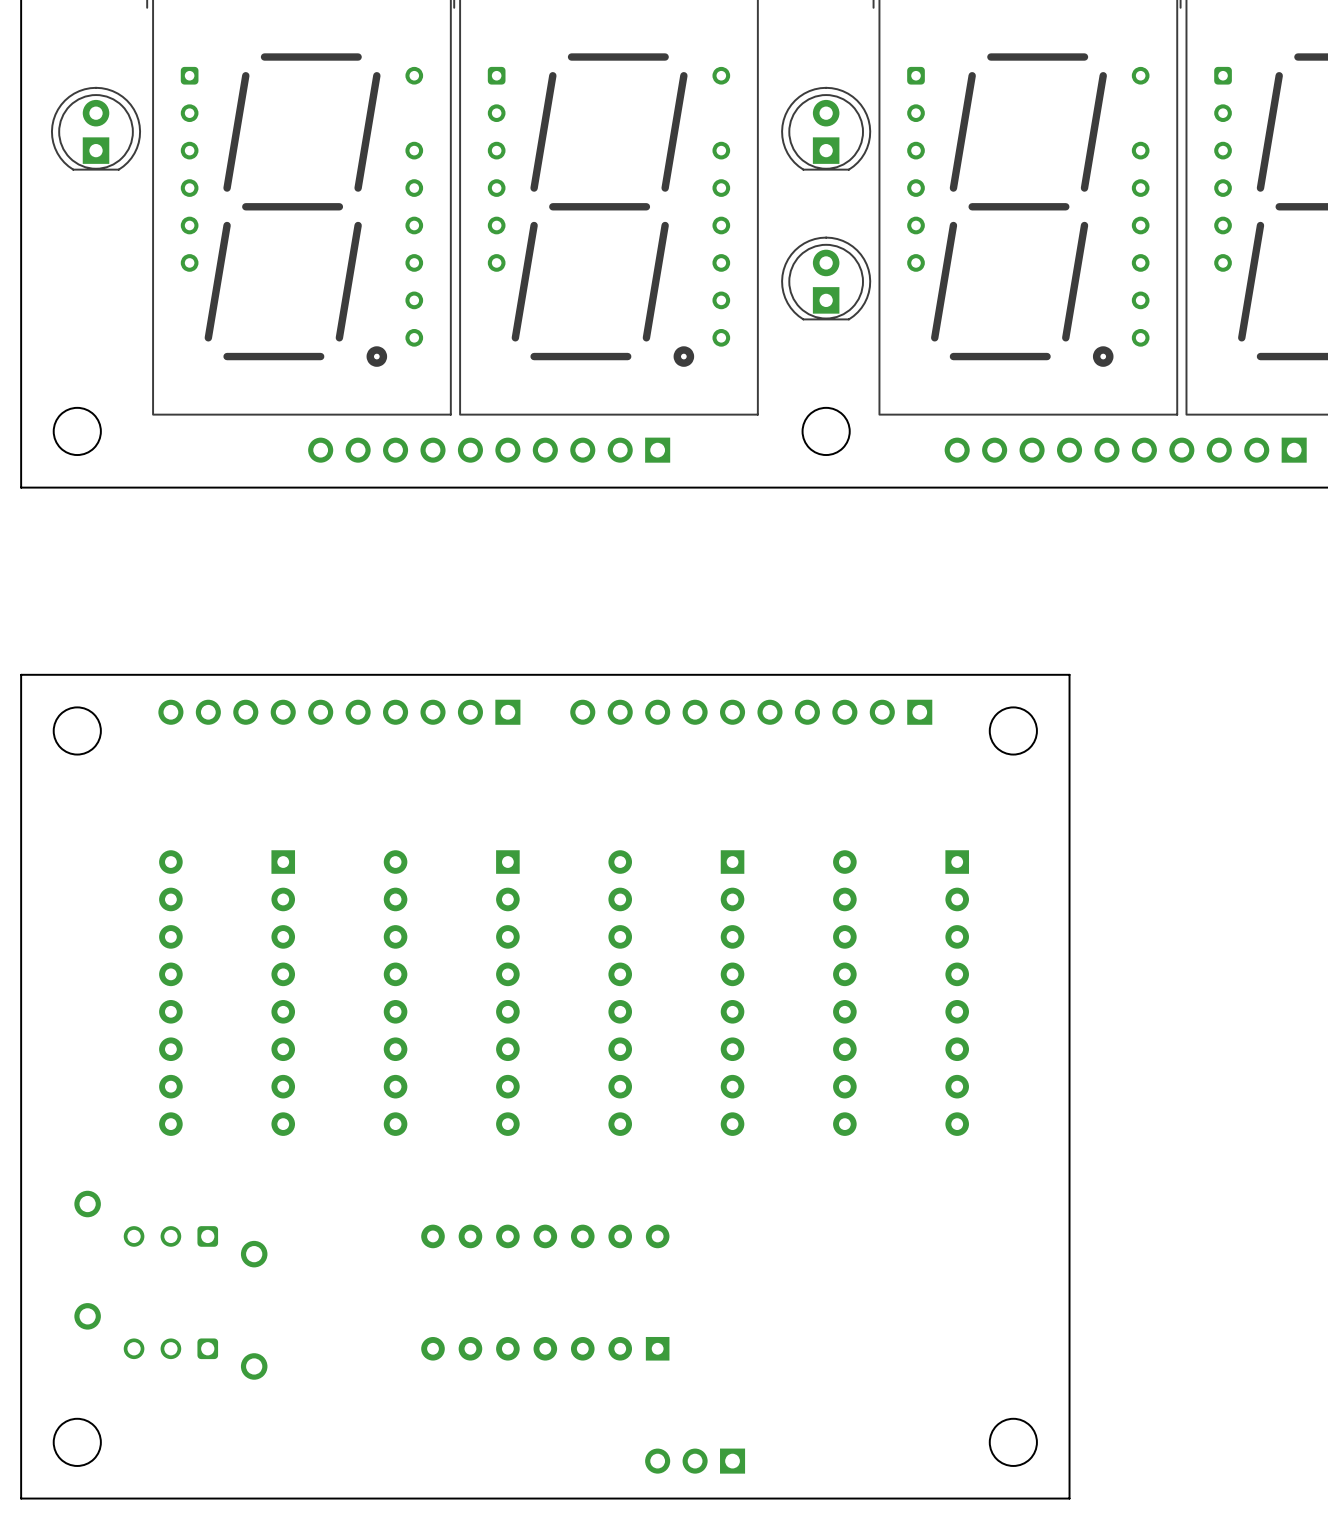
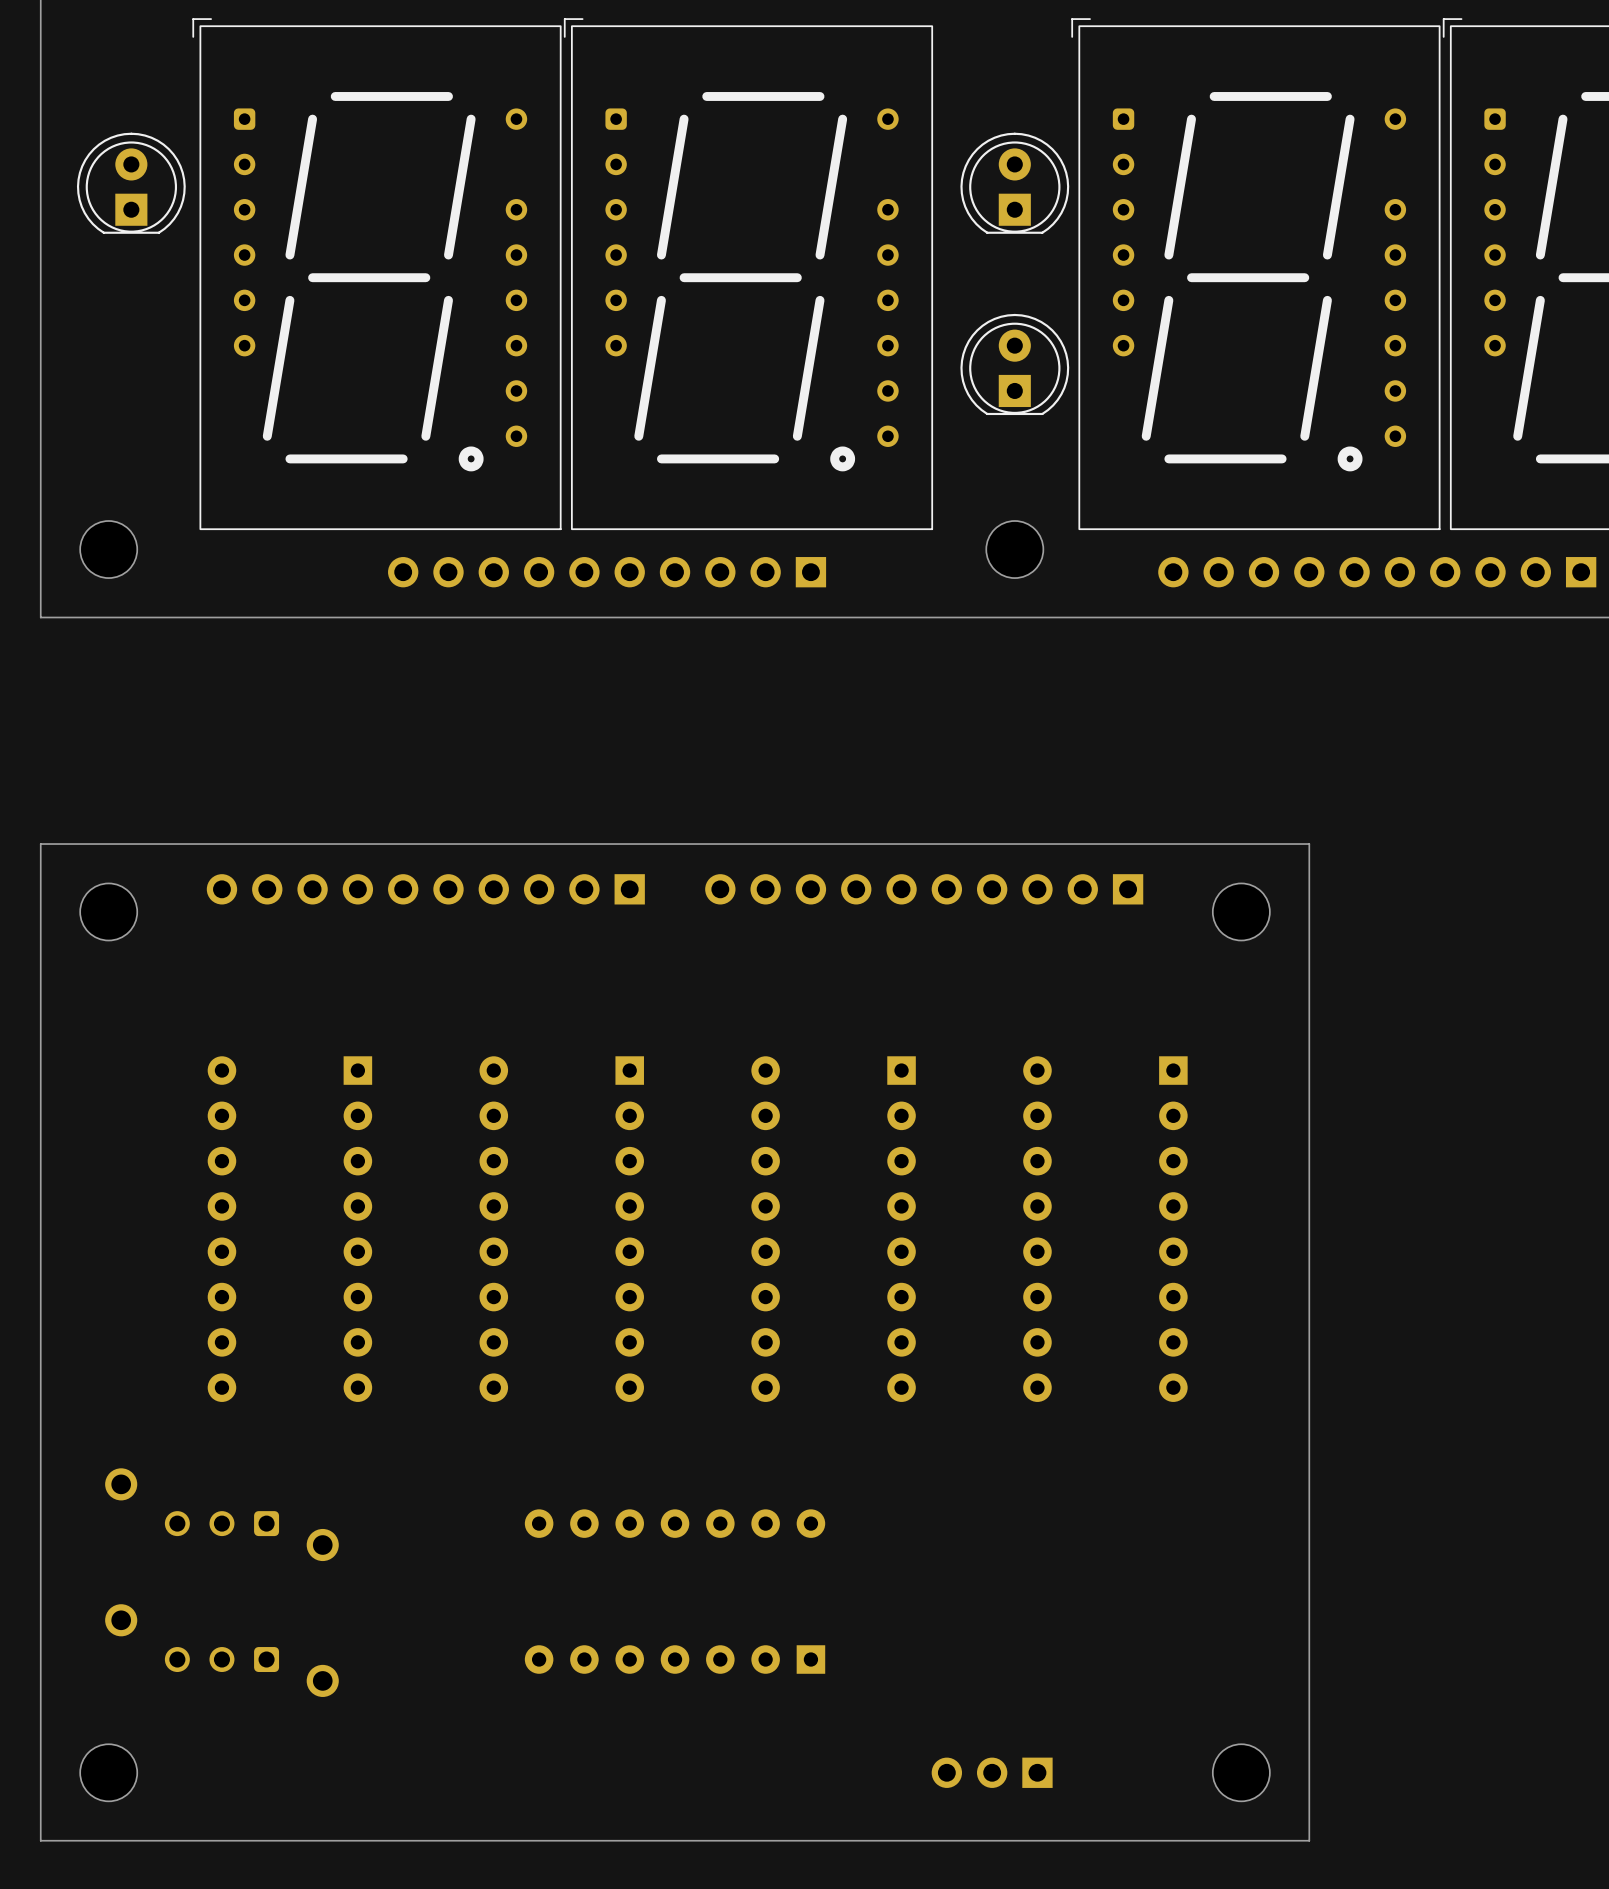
part position: (695, 1461) -> (992, 1772)

